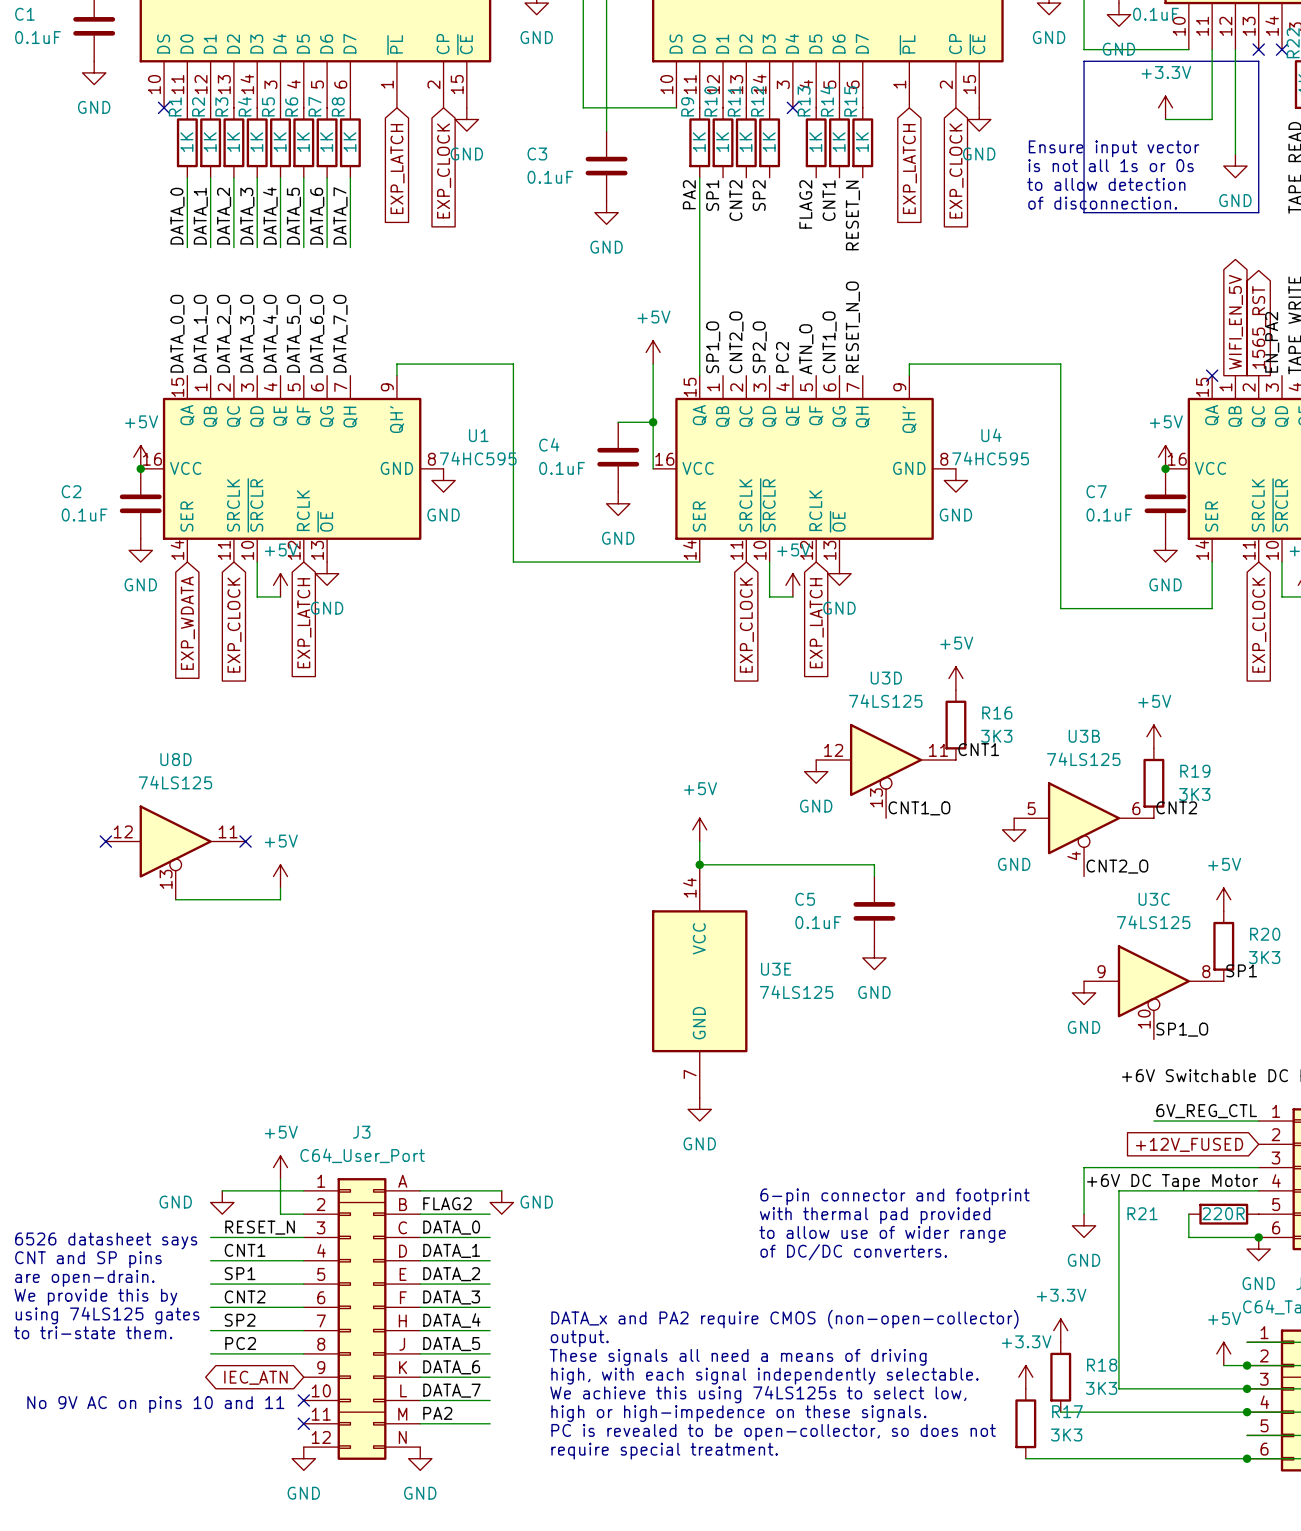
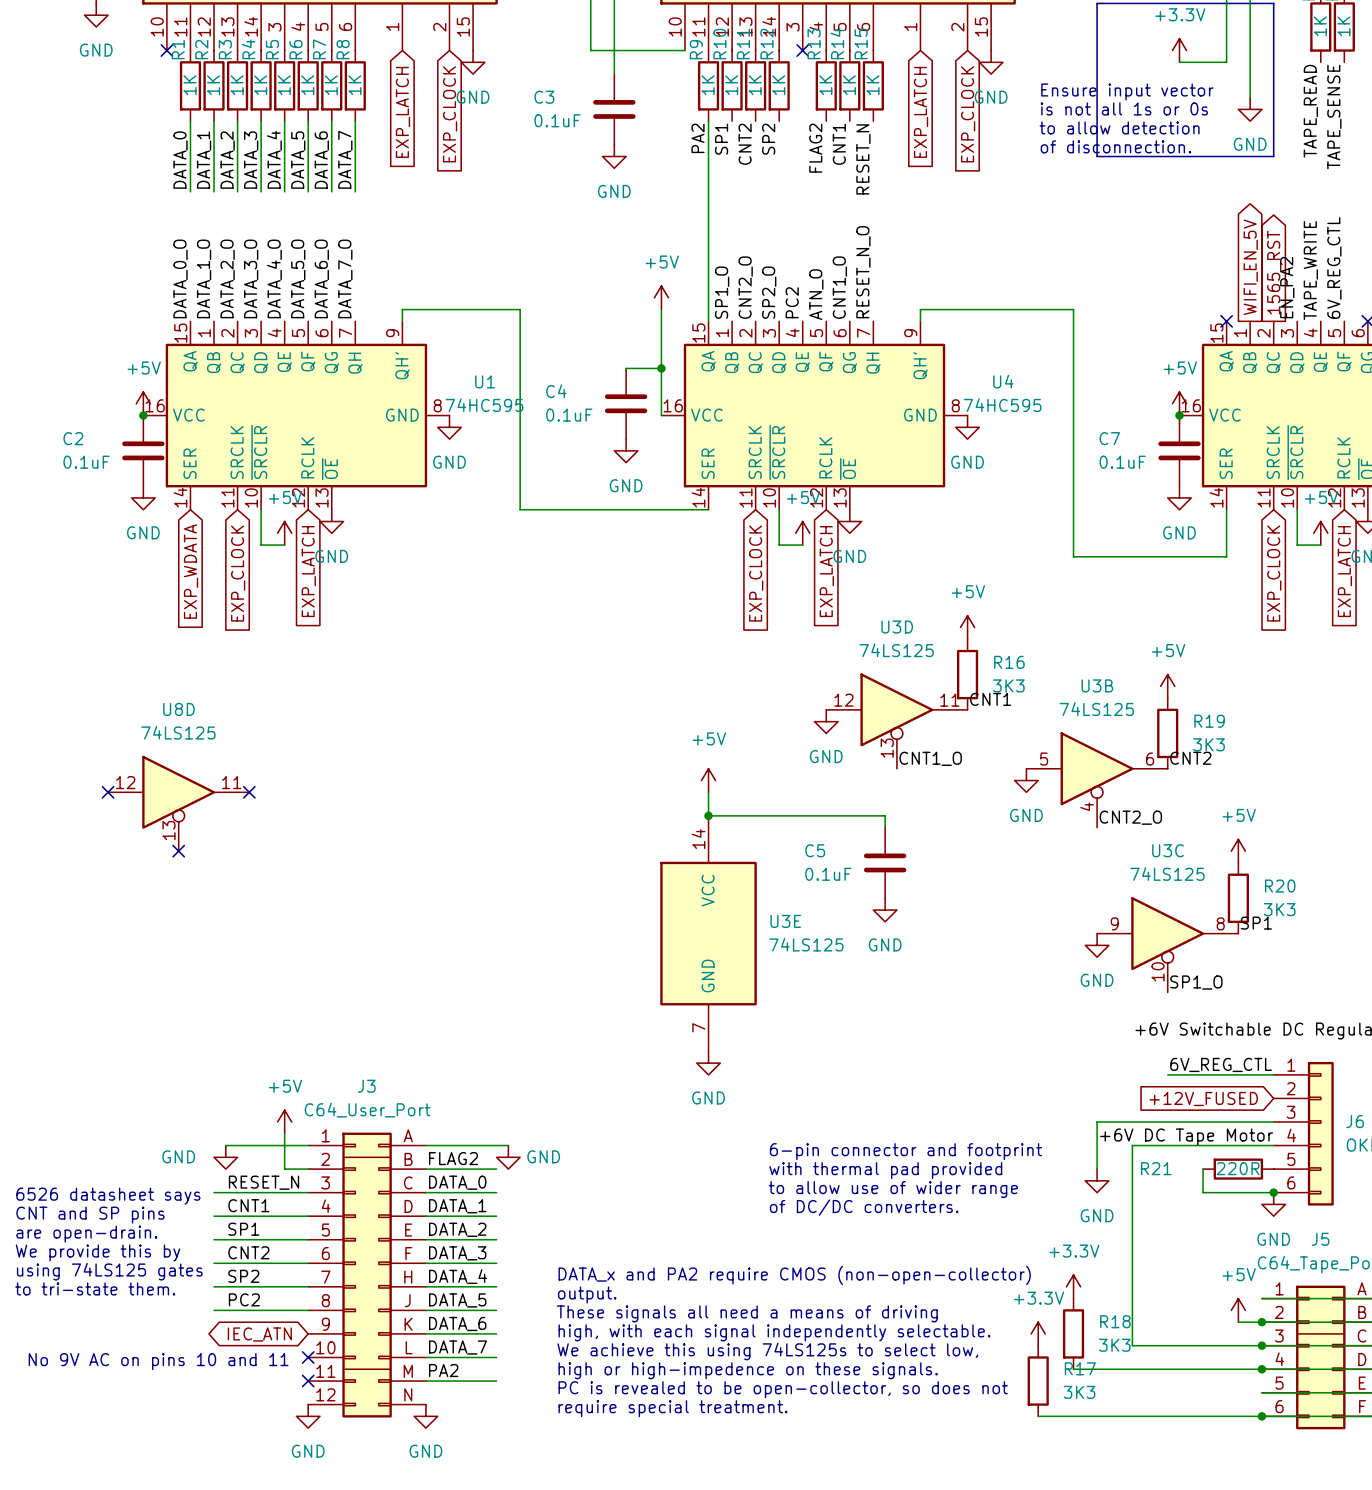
power symbol: +5V (280, 876) -> none
wire: (280, 888) (280, 899) (175, 899) -> none
no-connect mark: none -> (178, 851)

